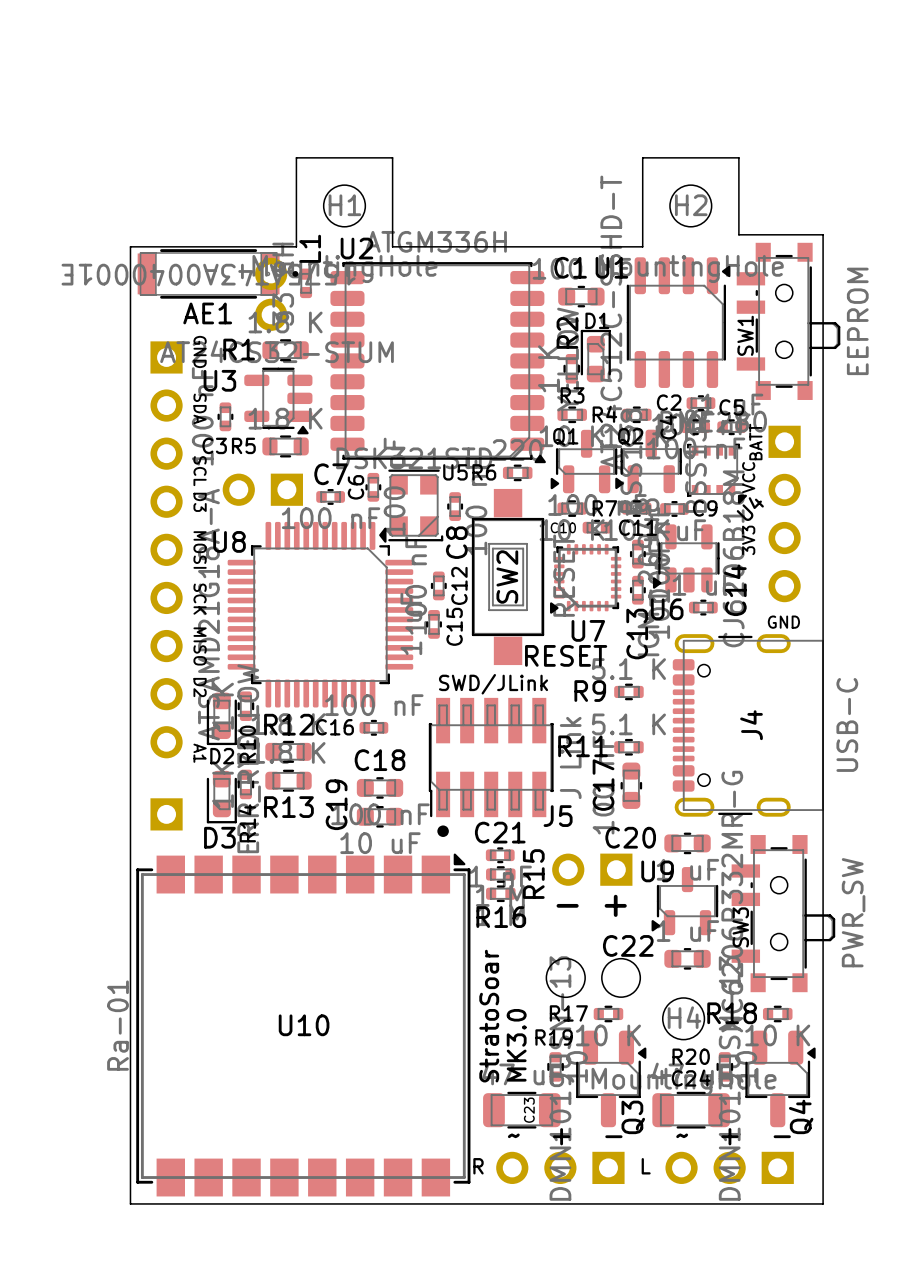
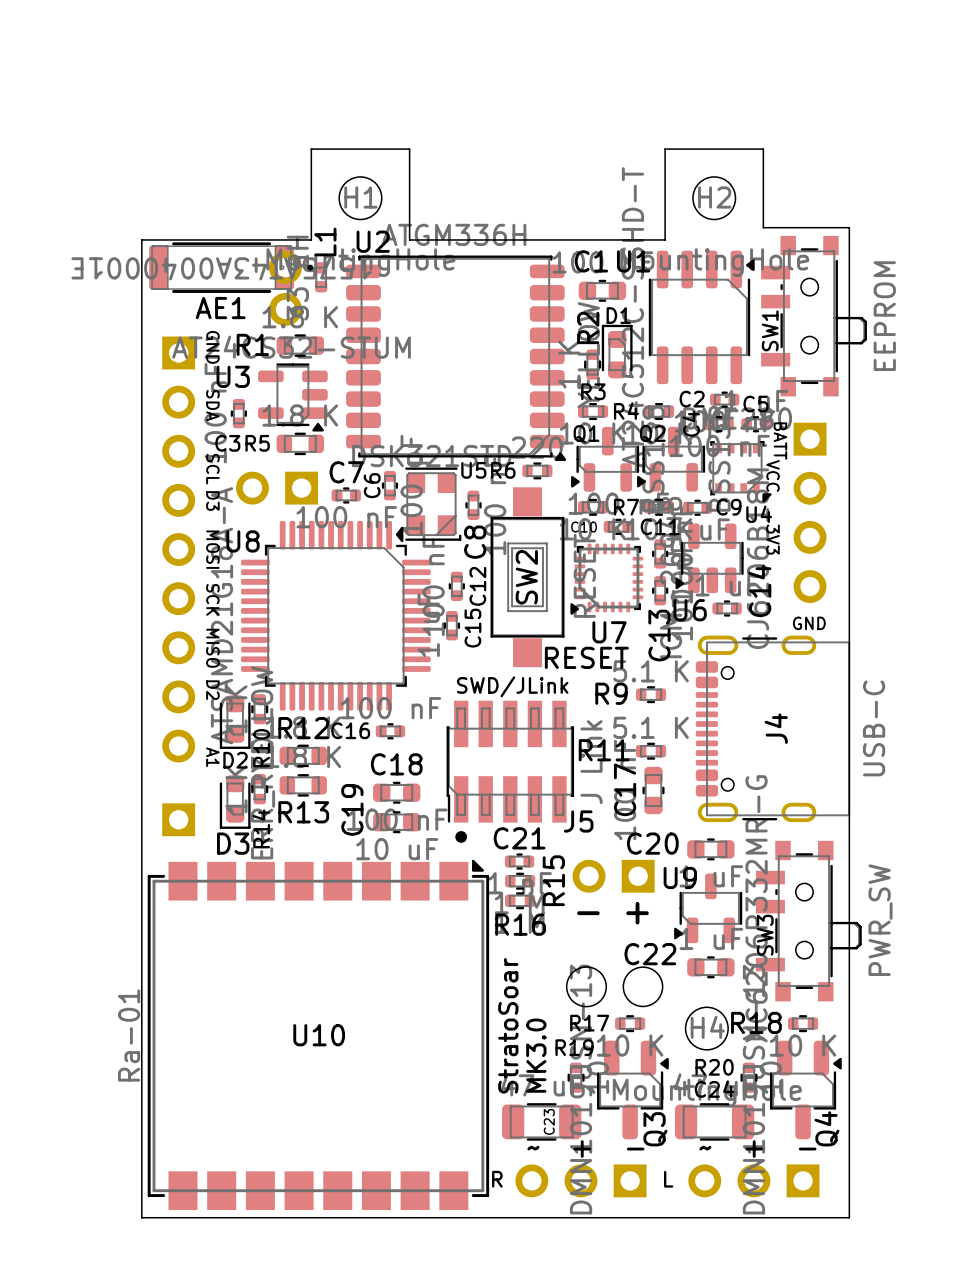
text rotation: 0° (755, 442) -> 180° (780, 441)
text rotation: 0° (748, 477) -> 180° (773, 475)
U4 name rotation: 0° (750, 509) -> 45° clockwise (759, 514)
text rotation: 0° (748, 540) -> 180° (773, 539)

